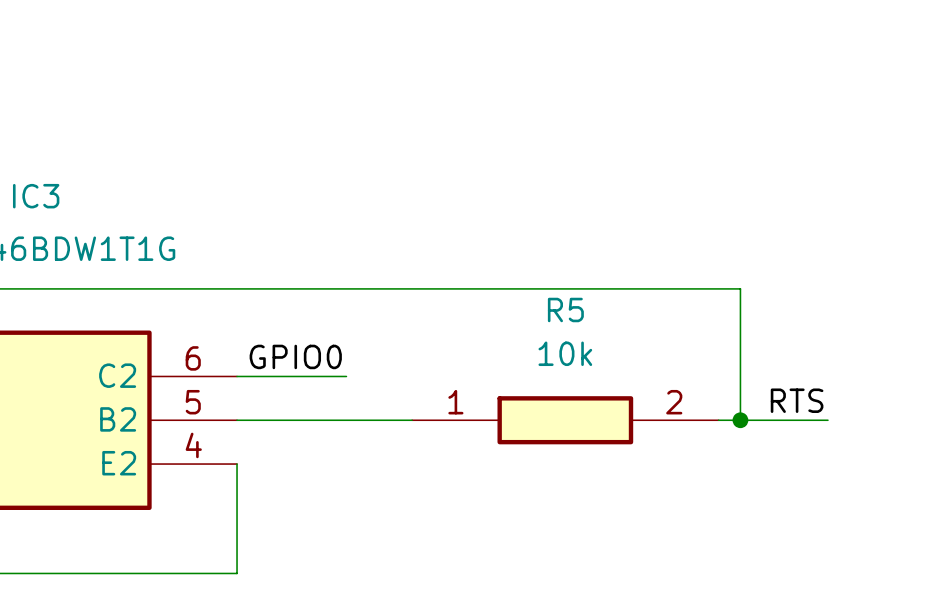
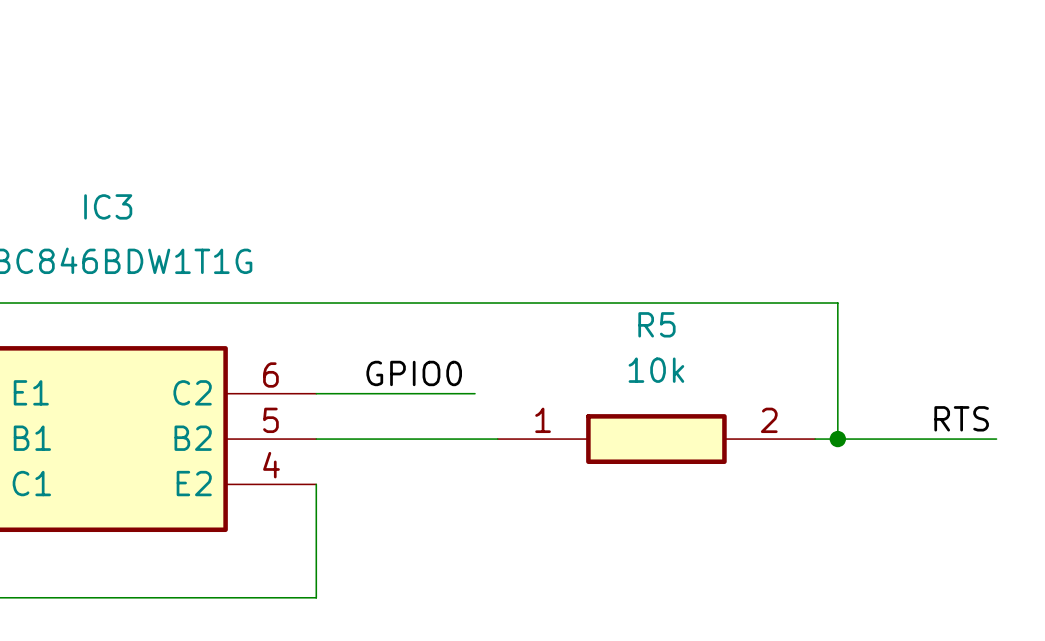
label position: GPIO0 (295, 356) -> GPIO0 (414, 373)
wire: none -> (429, 393) (475, 393)
label position: RTS (797, 400) -> RTS (961, 418)
wire: none -> (928, 439) (996, 439)

